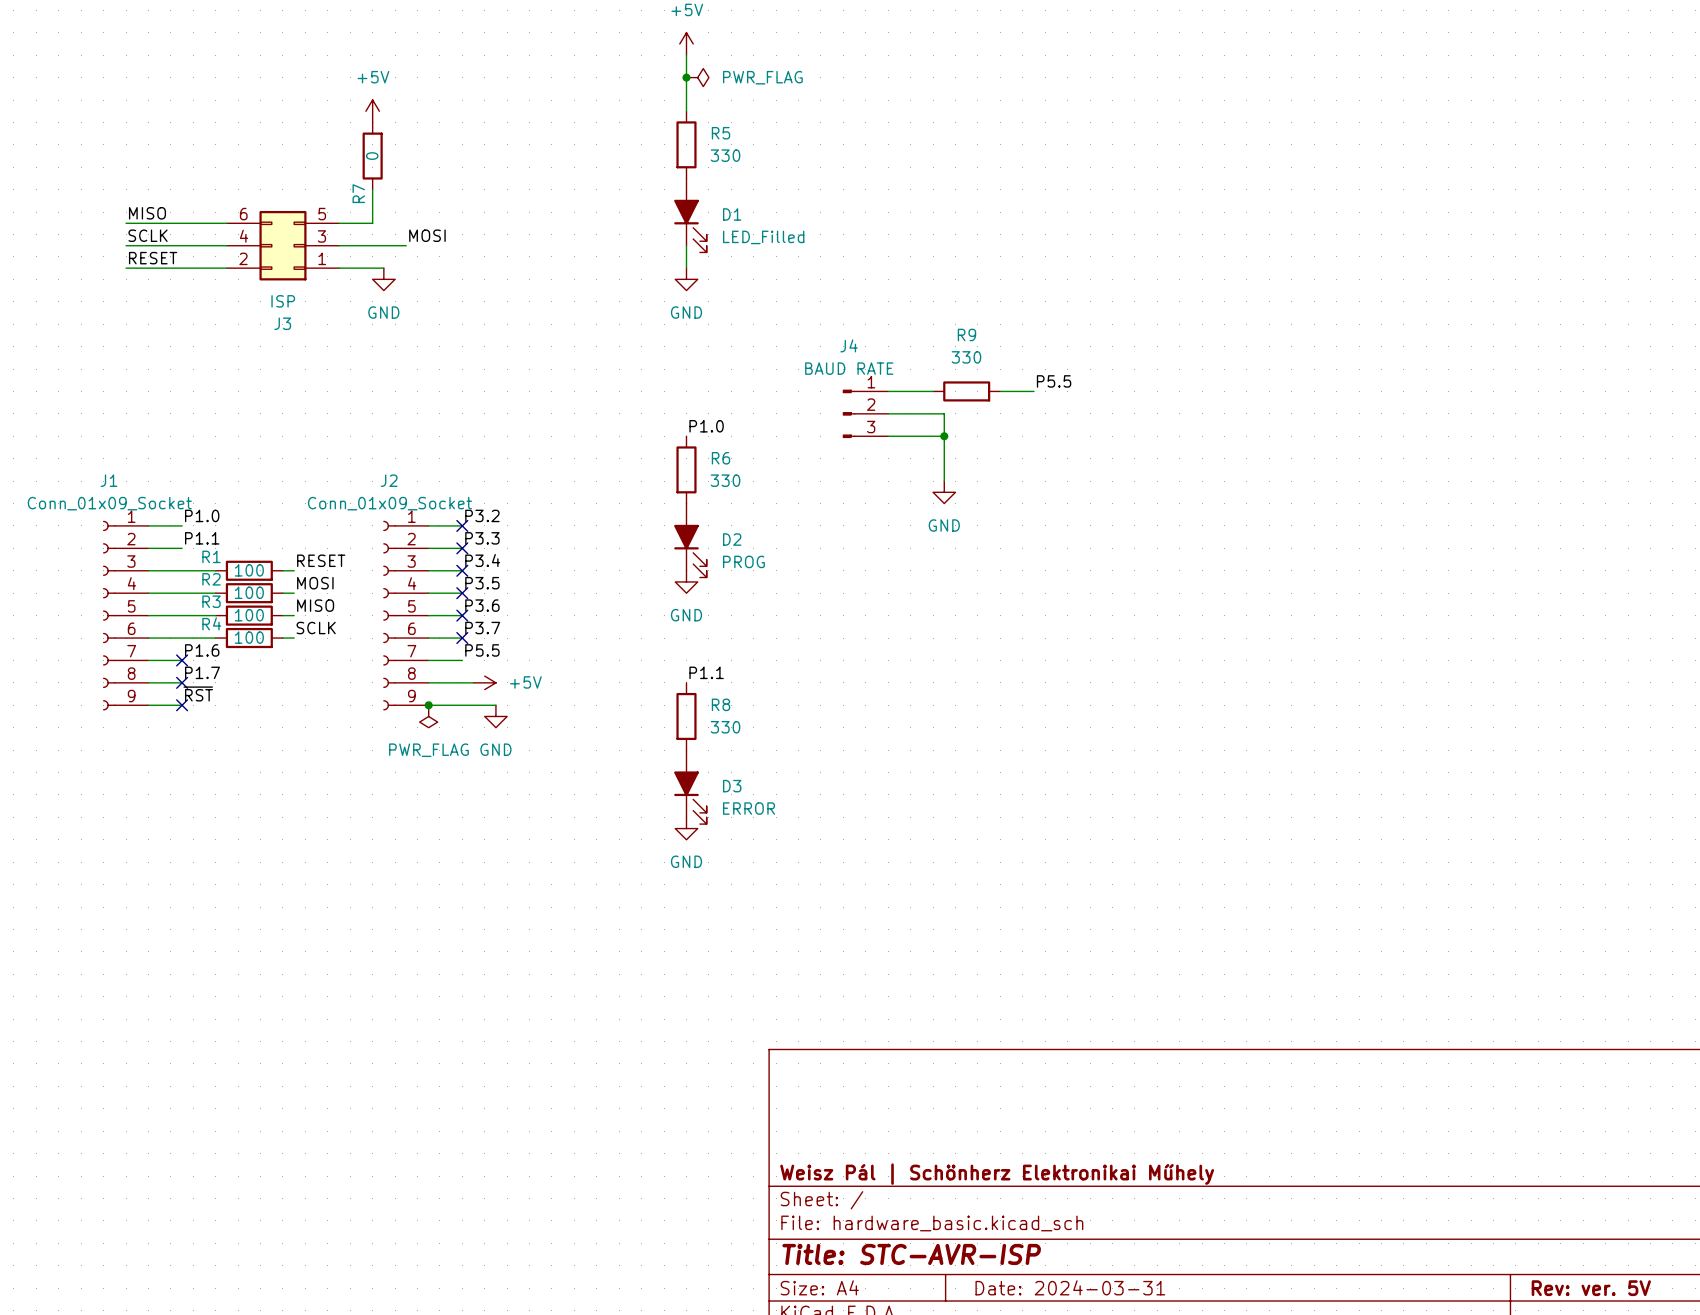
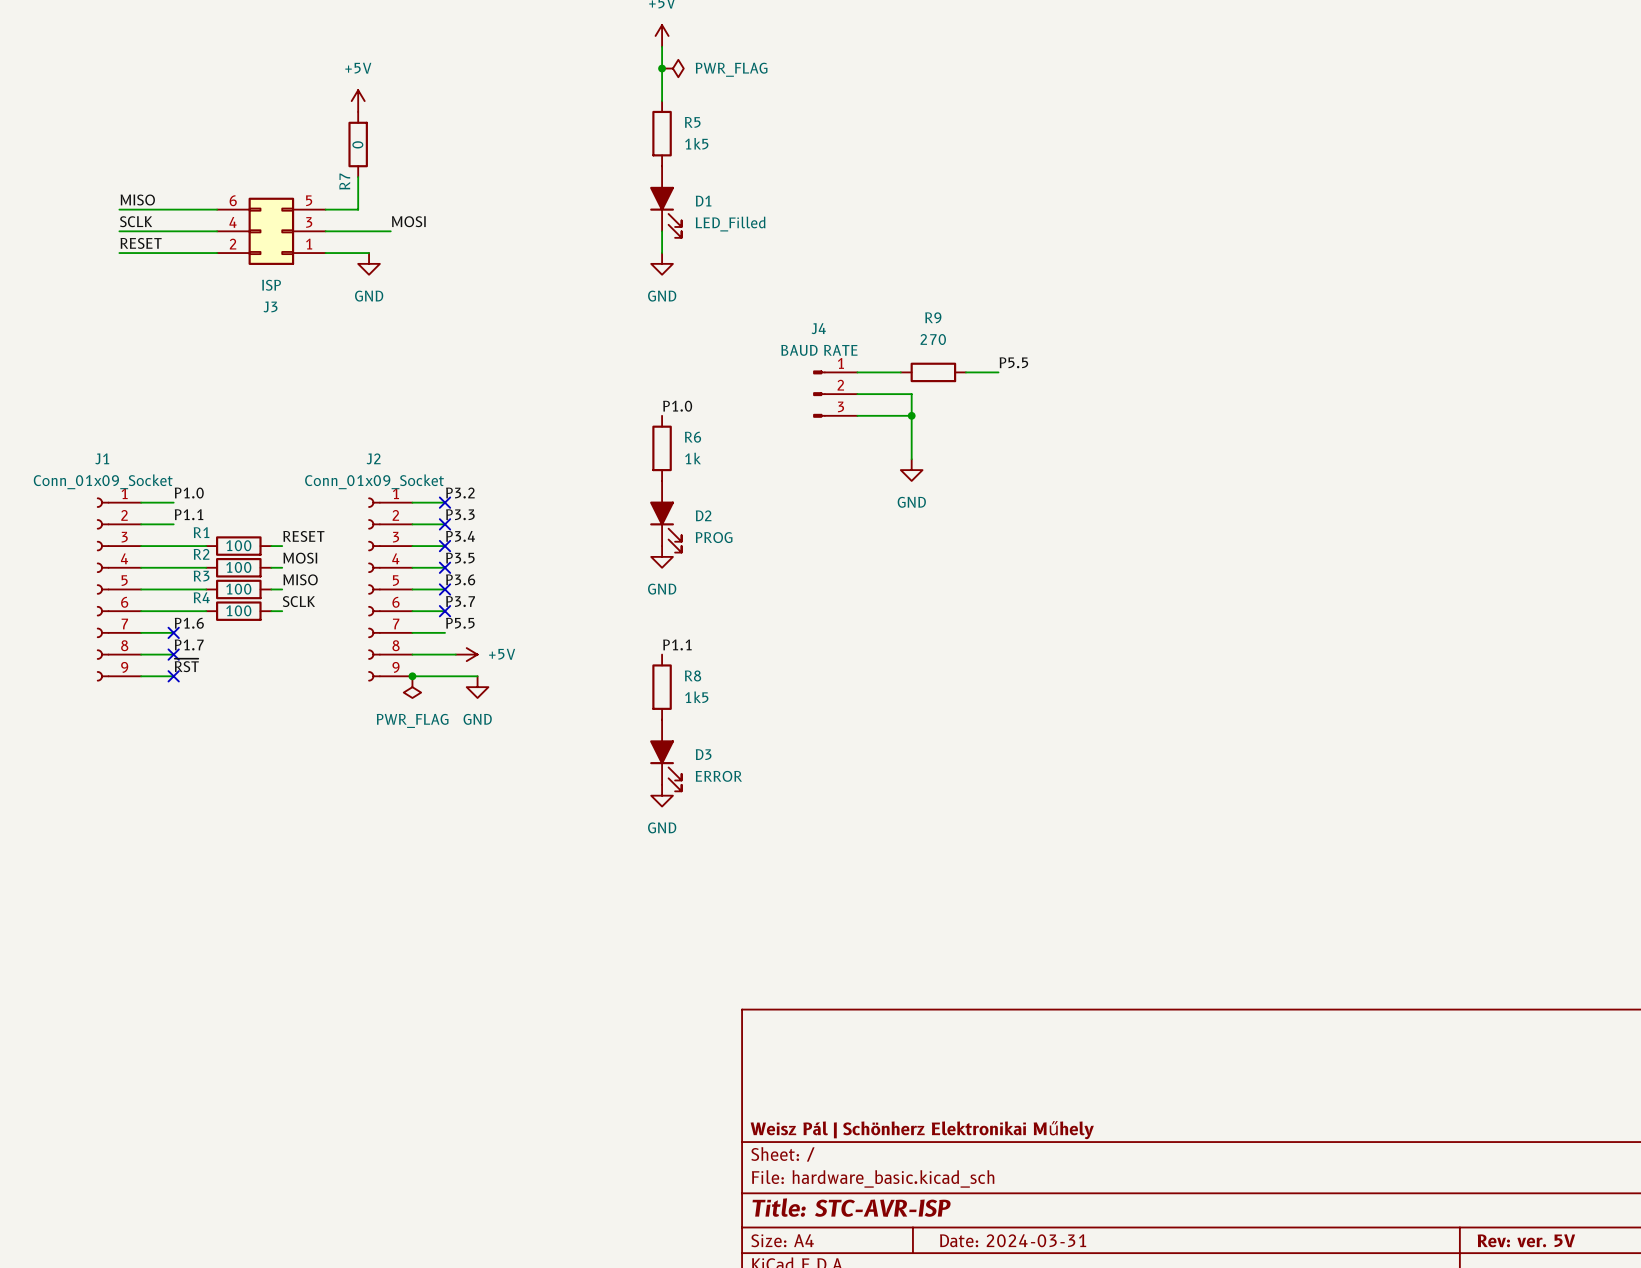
R5 value: 330 (725, 155) -> 1k5 (696, 143)
R9 value: 330 (966, 357) -> 270 (933, 339)
R6 value: 330 (725, 480) -> 1k (693, 458)
R8 value: 330 (725, 727) -> 1k5 (696, 697)

